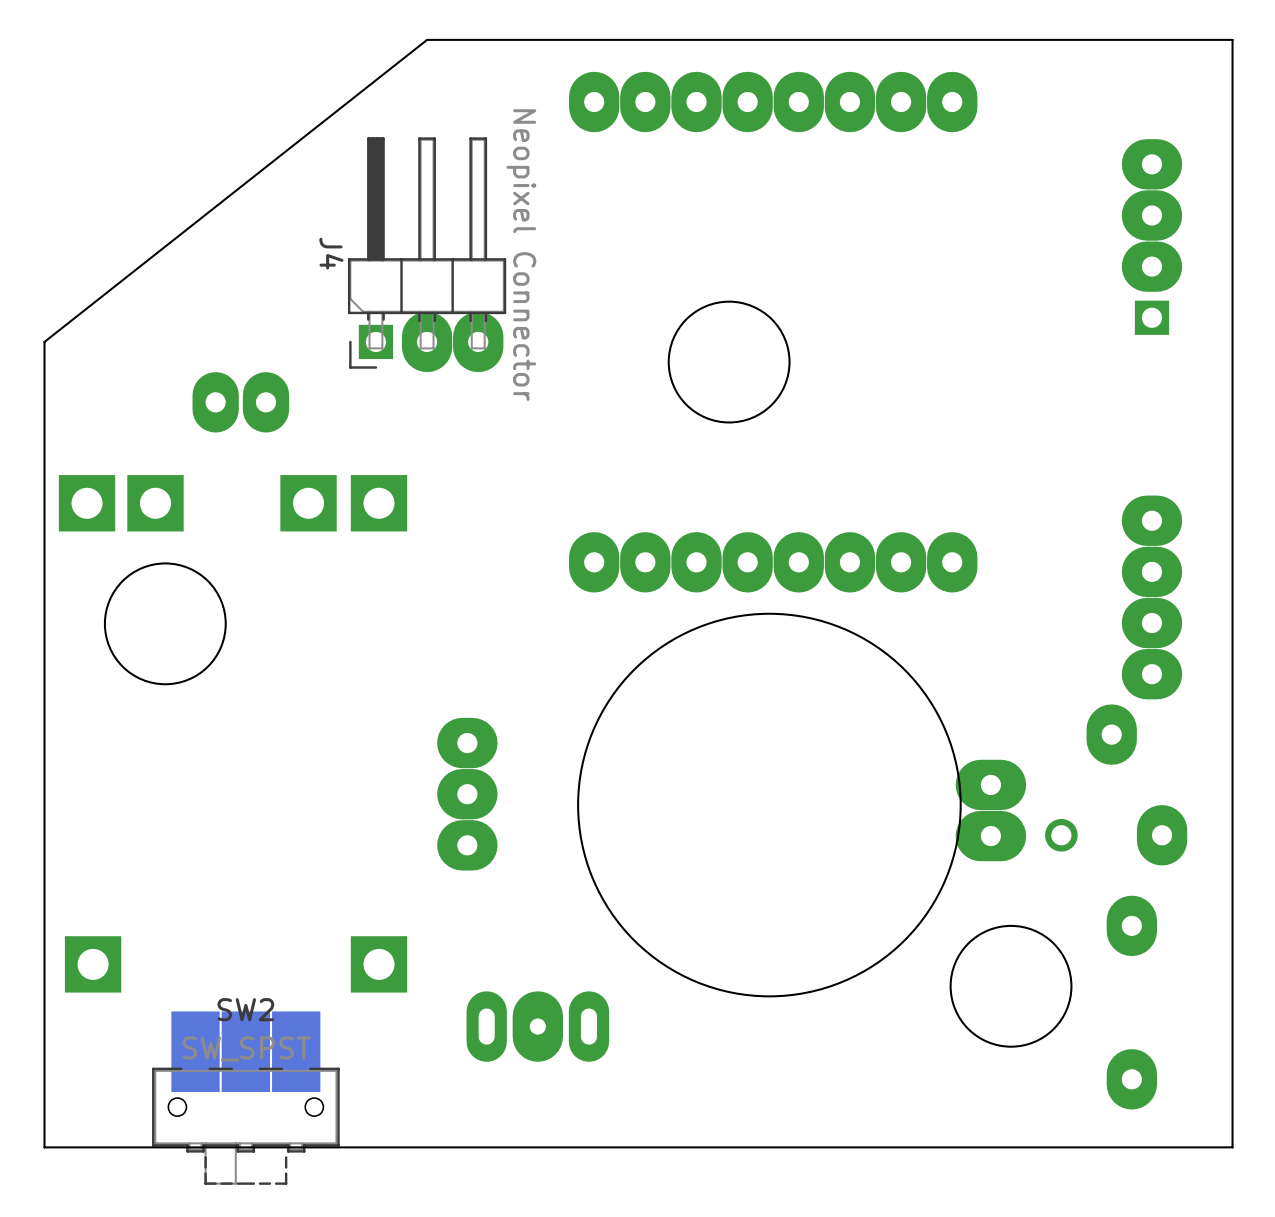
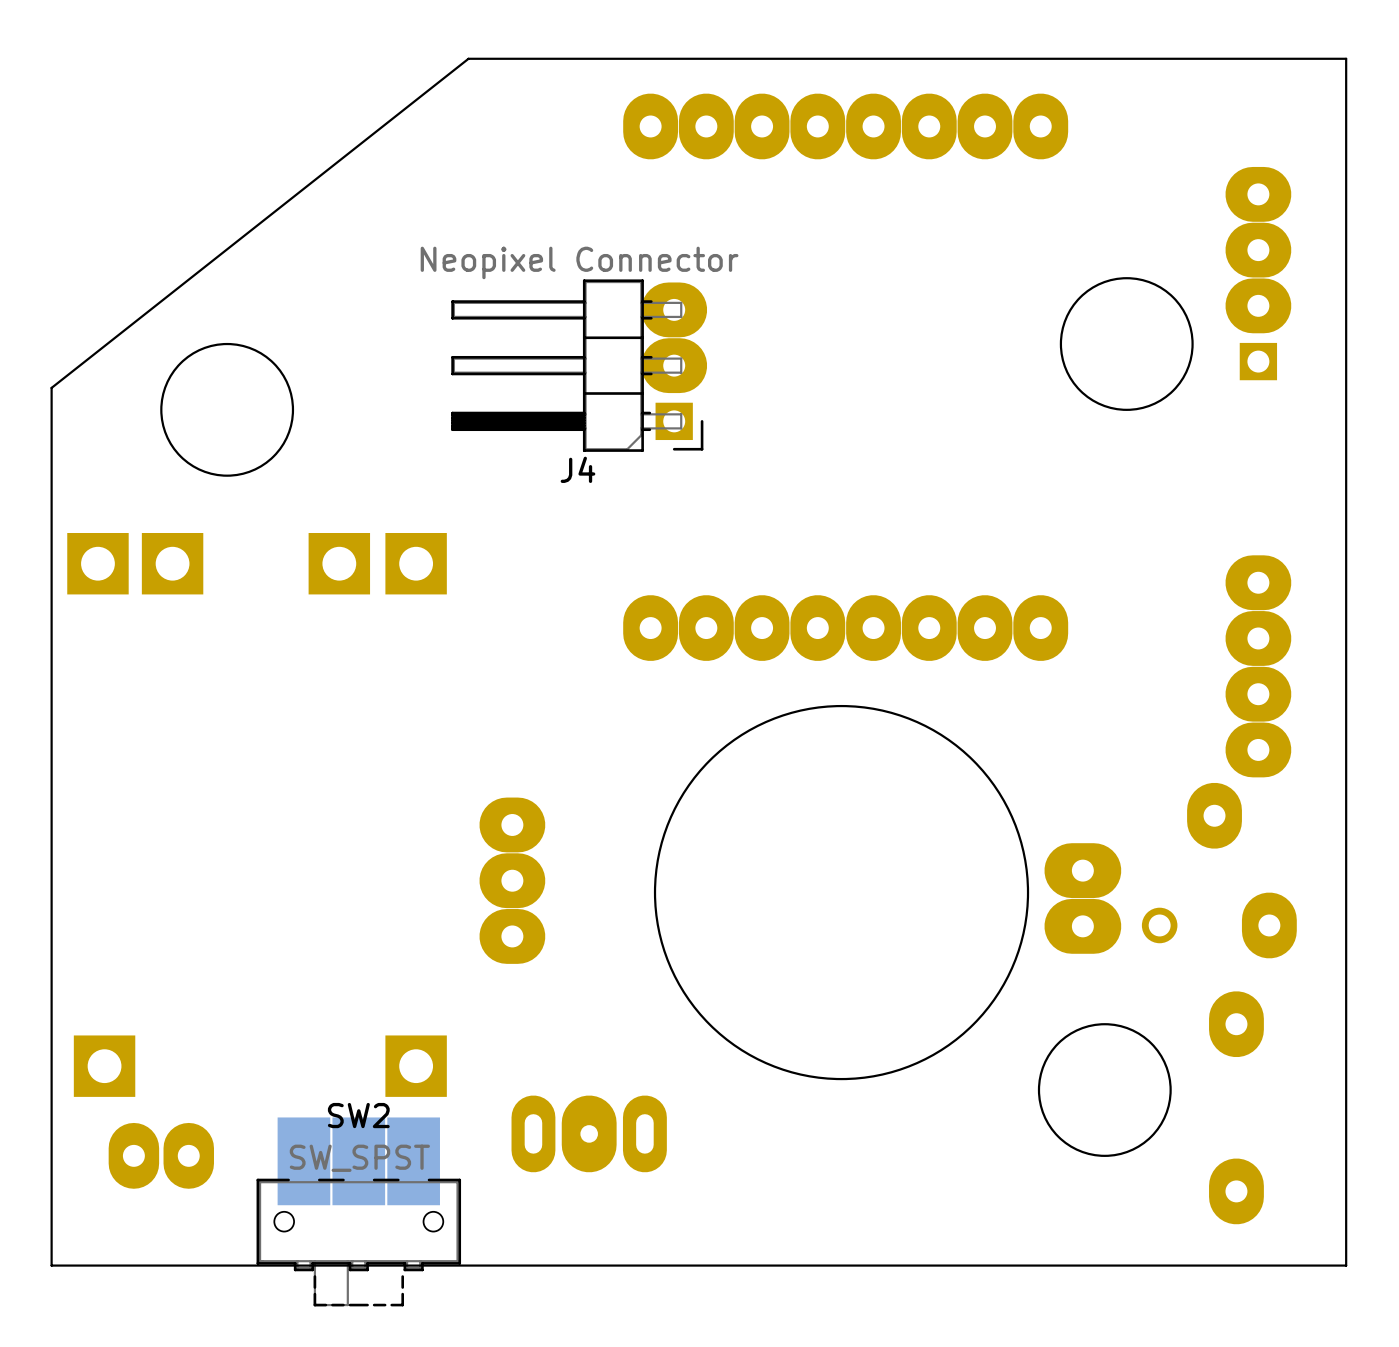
round board edge: none -> [1059, 277, 1194, 411]
J4 rotation: 0° (427, 254) -> 90° counterclockwise (579, 365)
round board edge: none -> [160, 342, 295, 477]
round board edge: [667, 300, 791, 424] -> none
part: (240, 402) -> none
round board edge: [103, 562, 227, 686] -> none
round board edge size: [577, 612, 962, 998] -> [653, 704, 1030, 1081]
part: none -> (161, 1155)
SW2 position: (245, 1098) -> (358, 1211)

